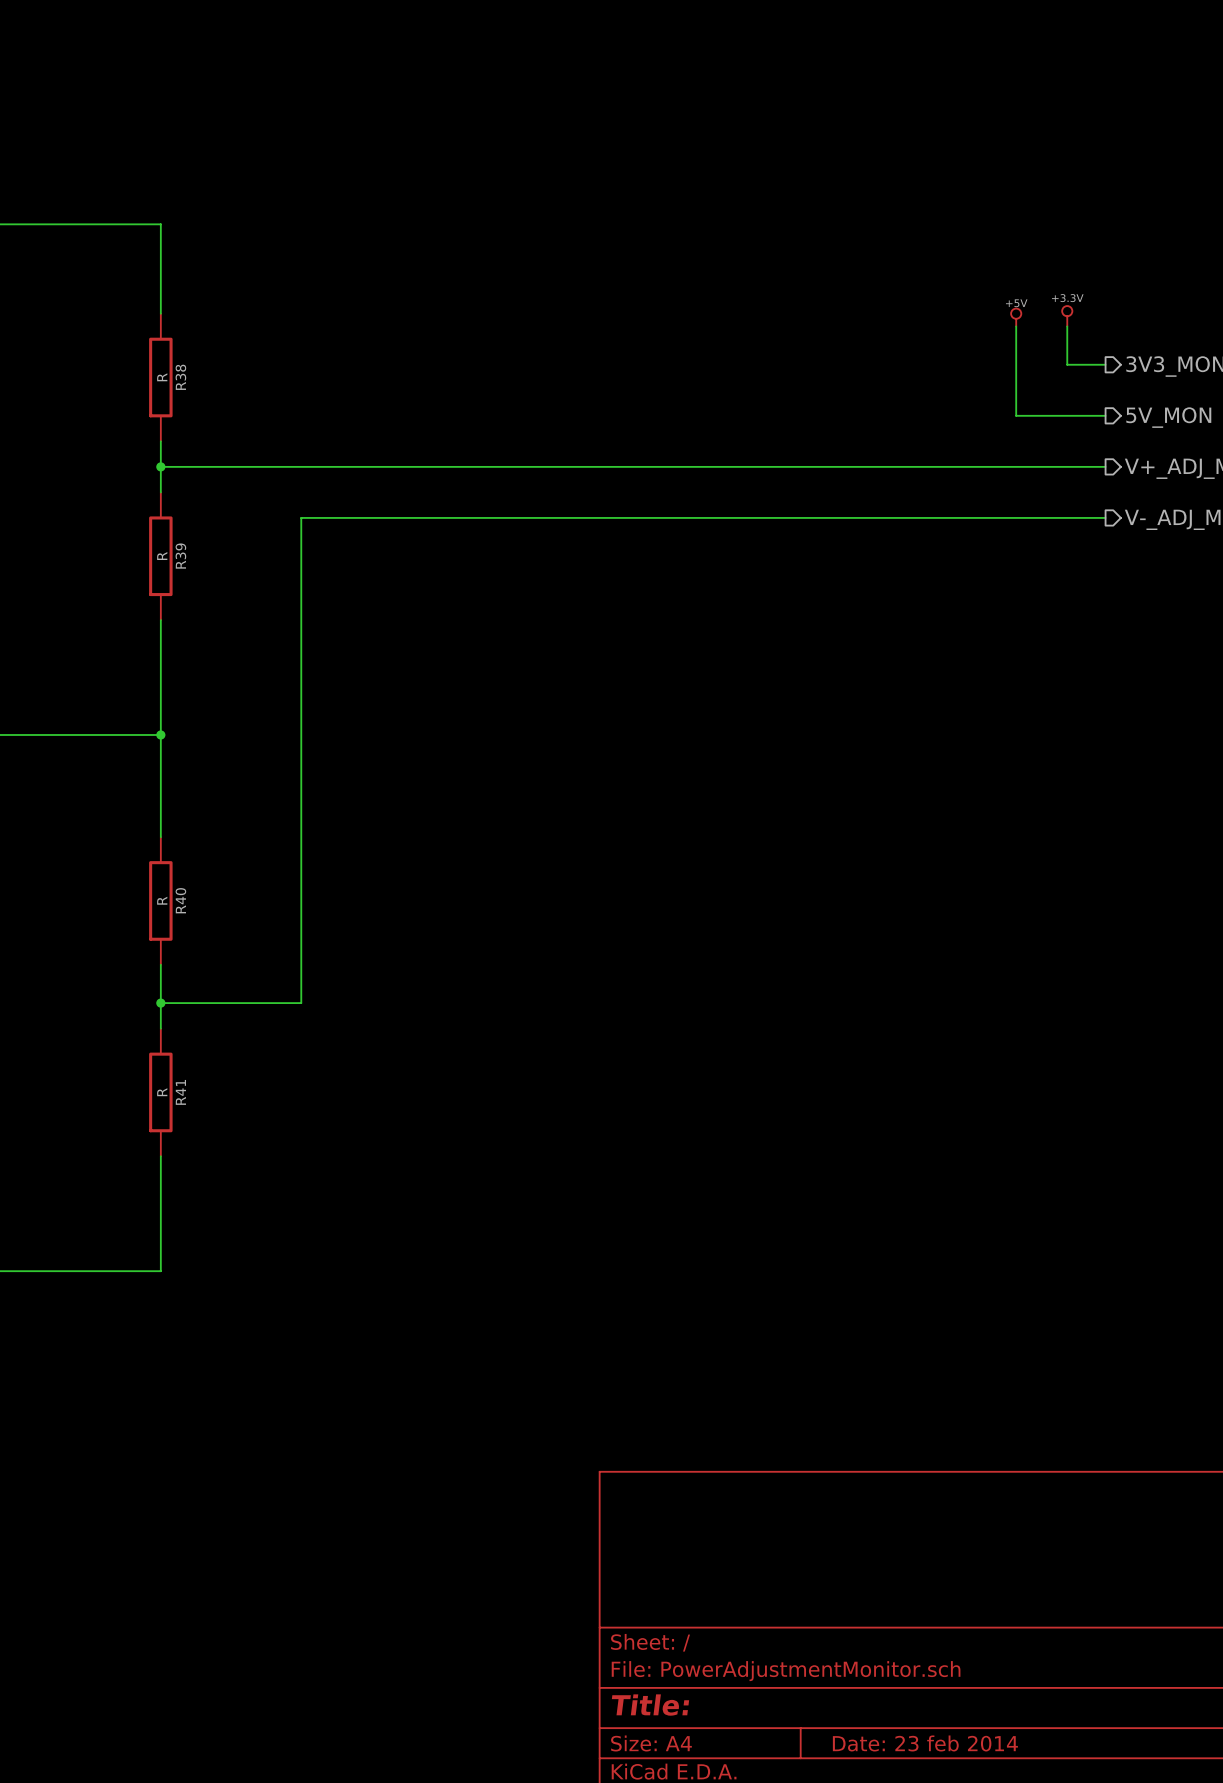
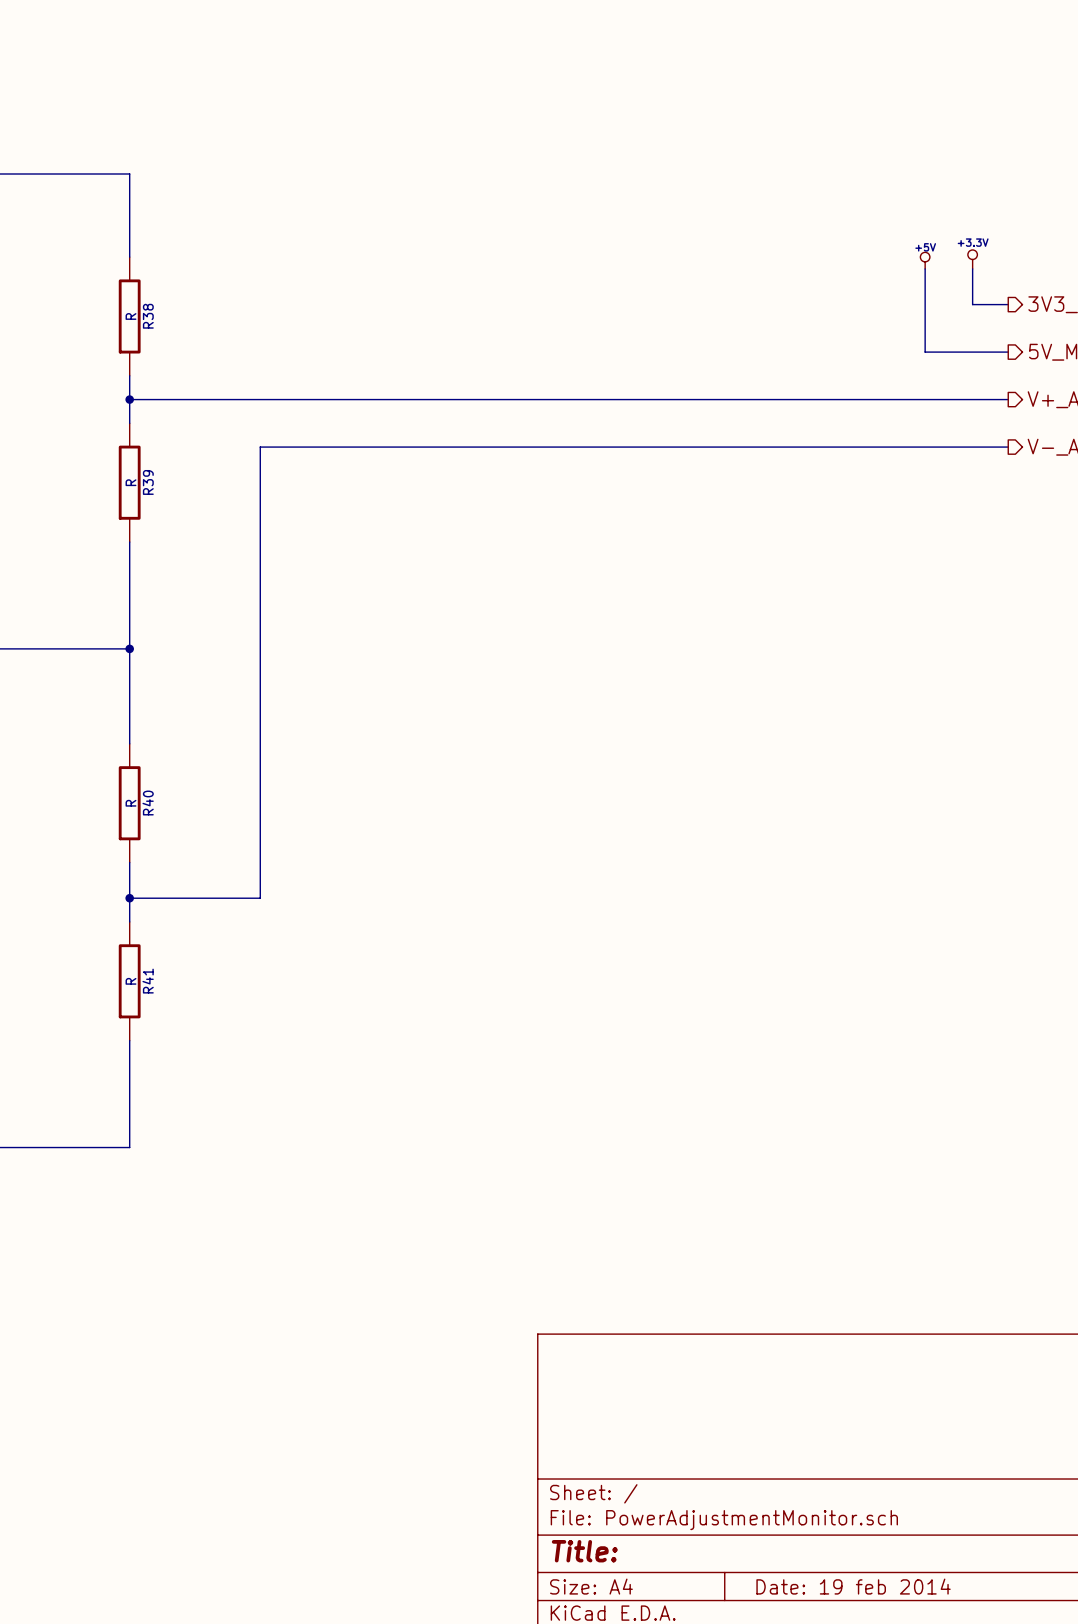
title block: Date: 23 feb 2014 (925, 1743) -> Date: 19 feb 2014 (853, 1586)

